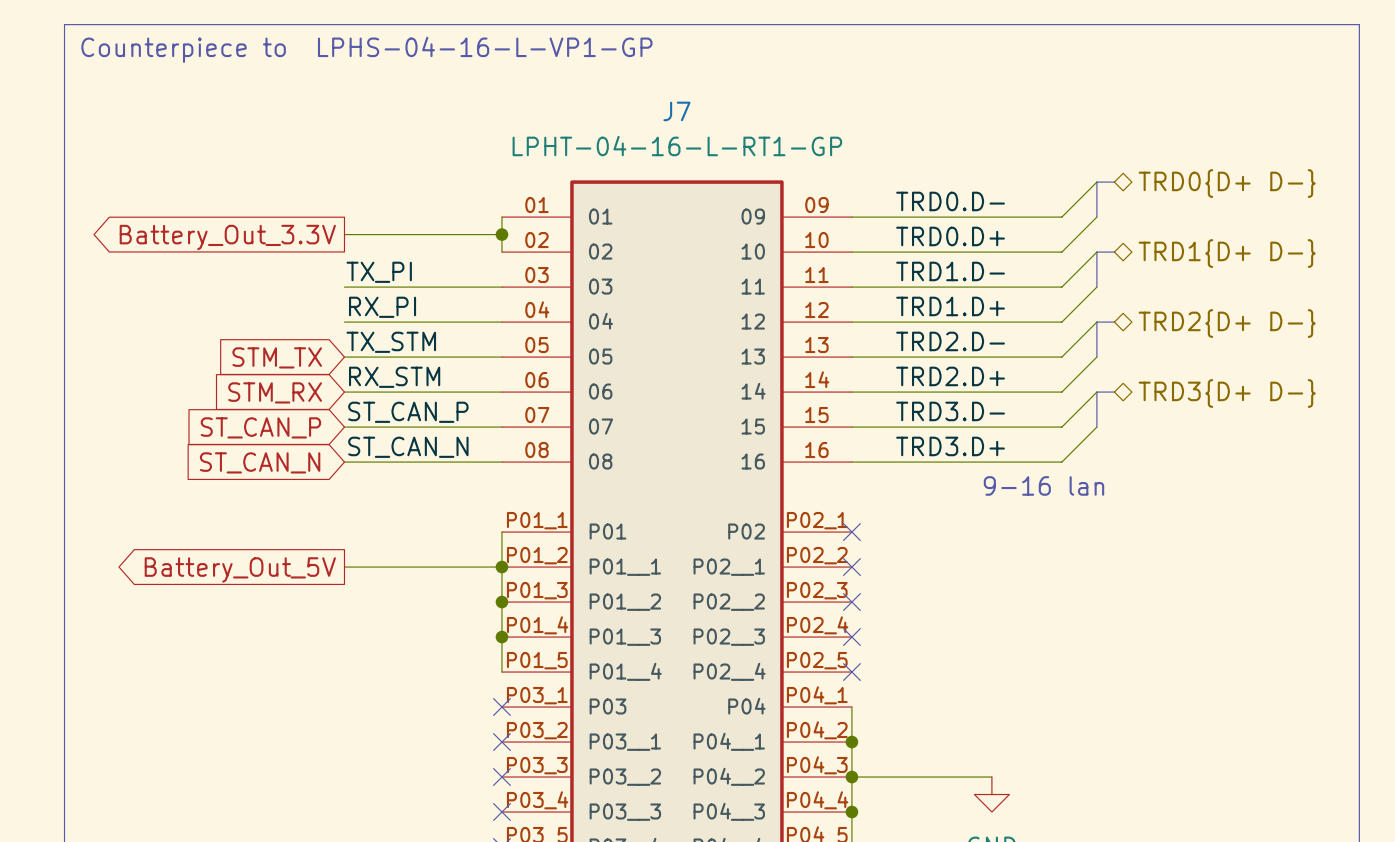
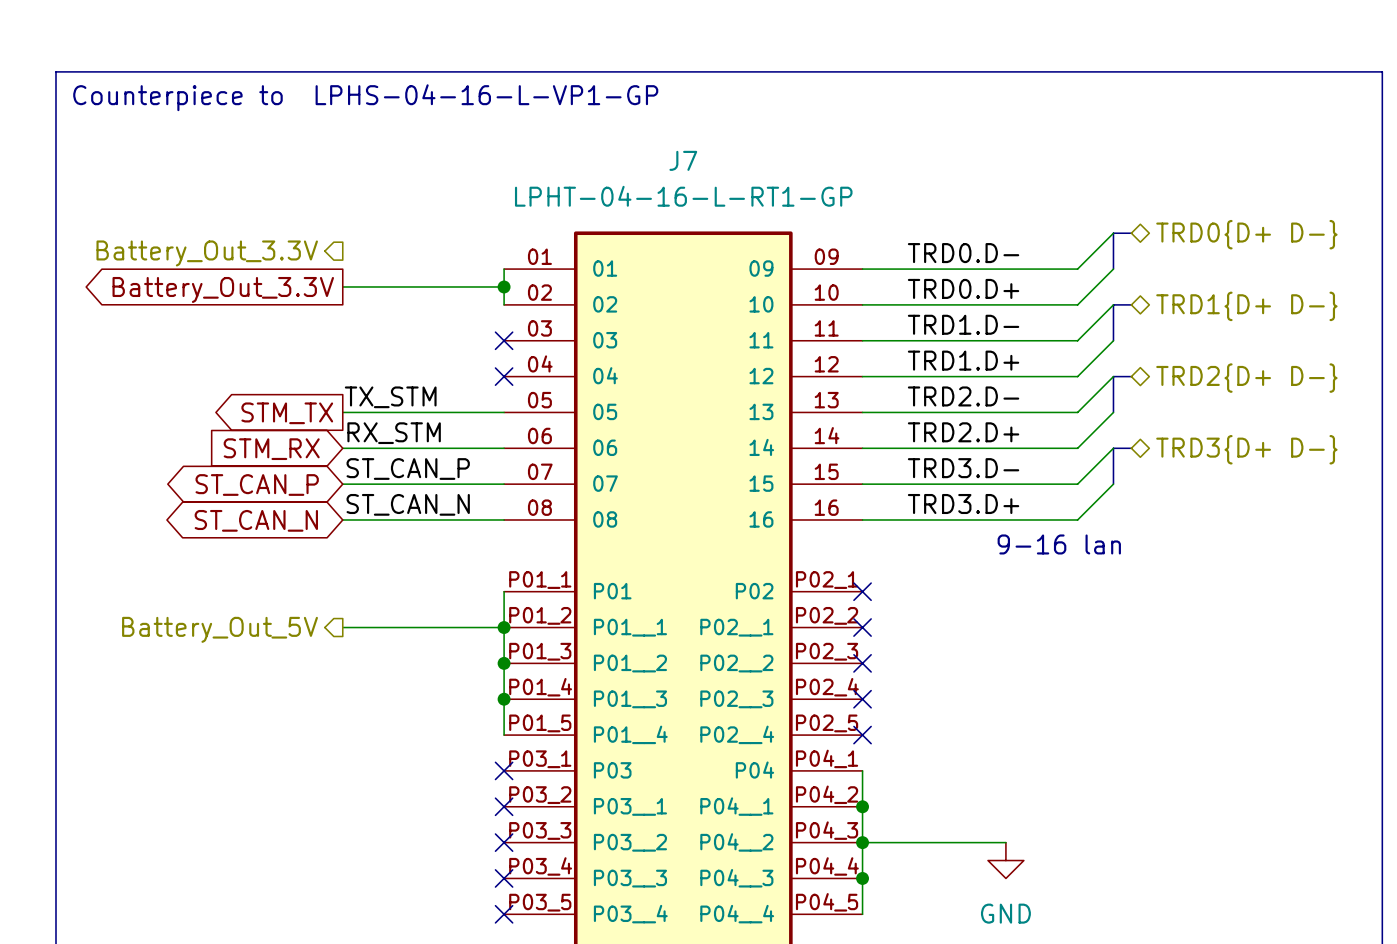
hierarchical label: none -> Battery_Out_3.3V (207, 253)
label: TX_PI (379, 272) -> none
wire: (344, 287) (501, 287) -> none
no-connect mark: none -> (504, 340)
label: RX_PI (382, 307) -> none
wire: (344, 322) (501, 322) -> none
no-connect mark: none -> (504, 376)
global label shape: input (277, 357) -> output (287, 413)
global label shape: input (260, 427) -> bidirectional (257, 485)
global label shape: input (260, 462) -> bidirectional (256, 520)
hierarchical label: none -> Battery_Out_5V (220, 629)
global label: Battery_Out_5V (240, 569) -> none

